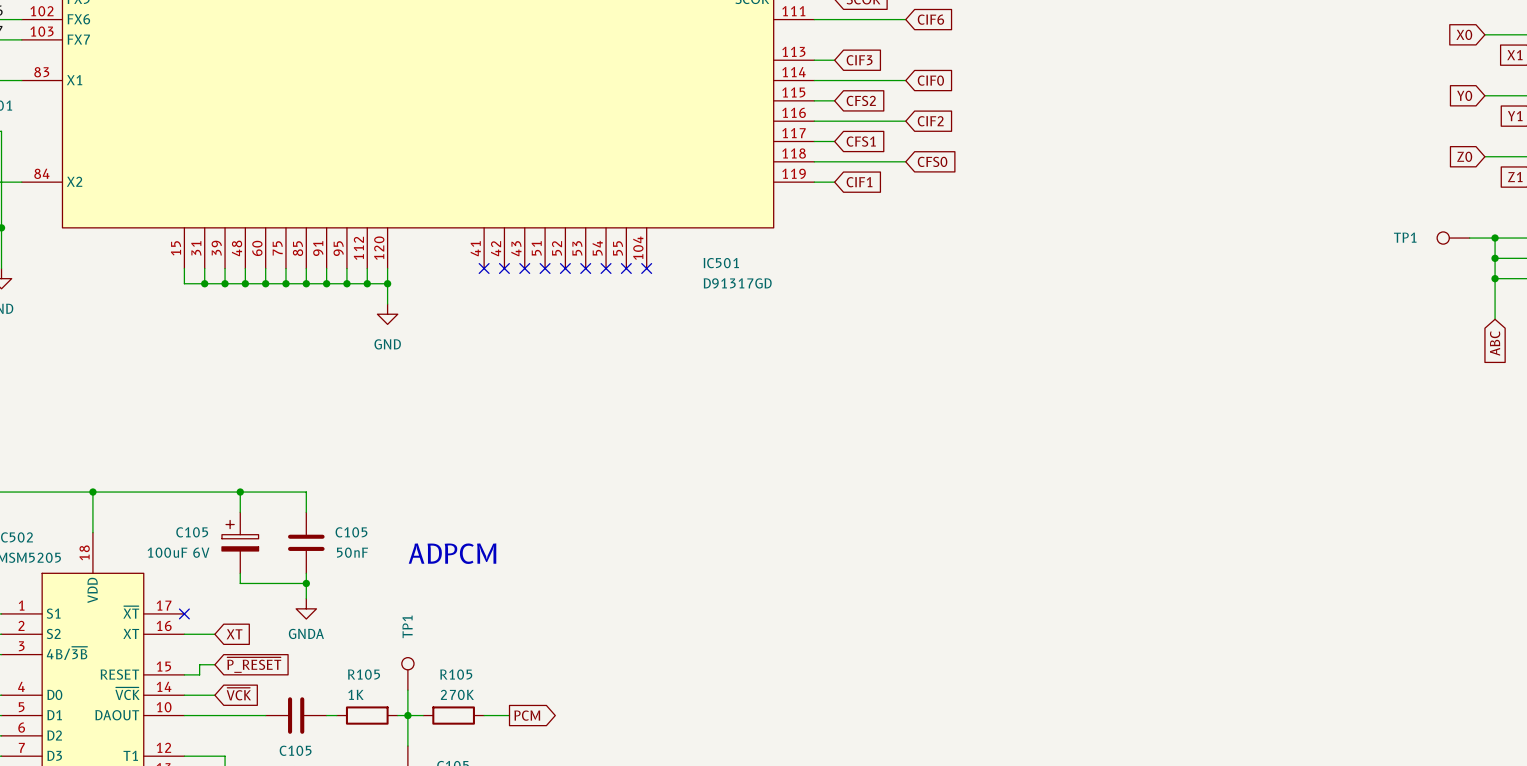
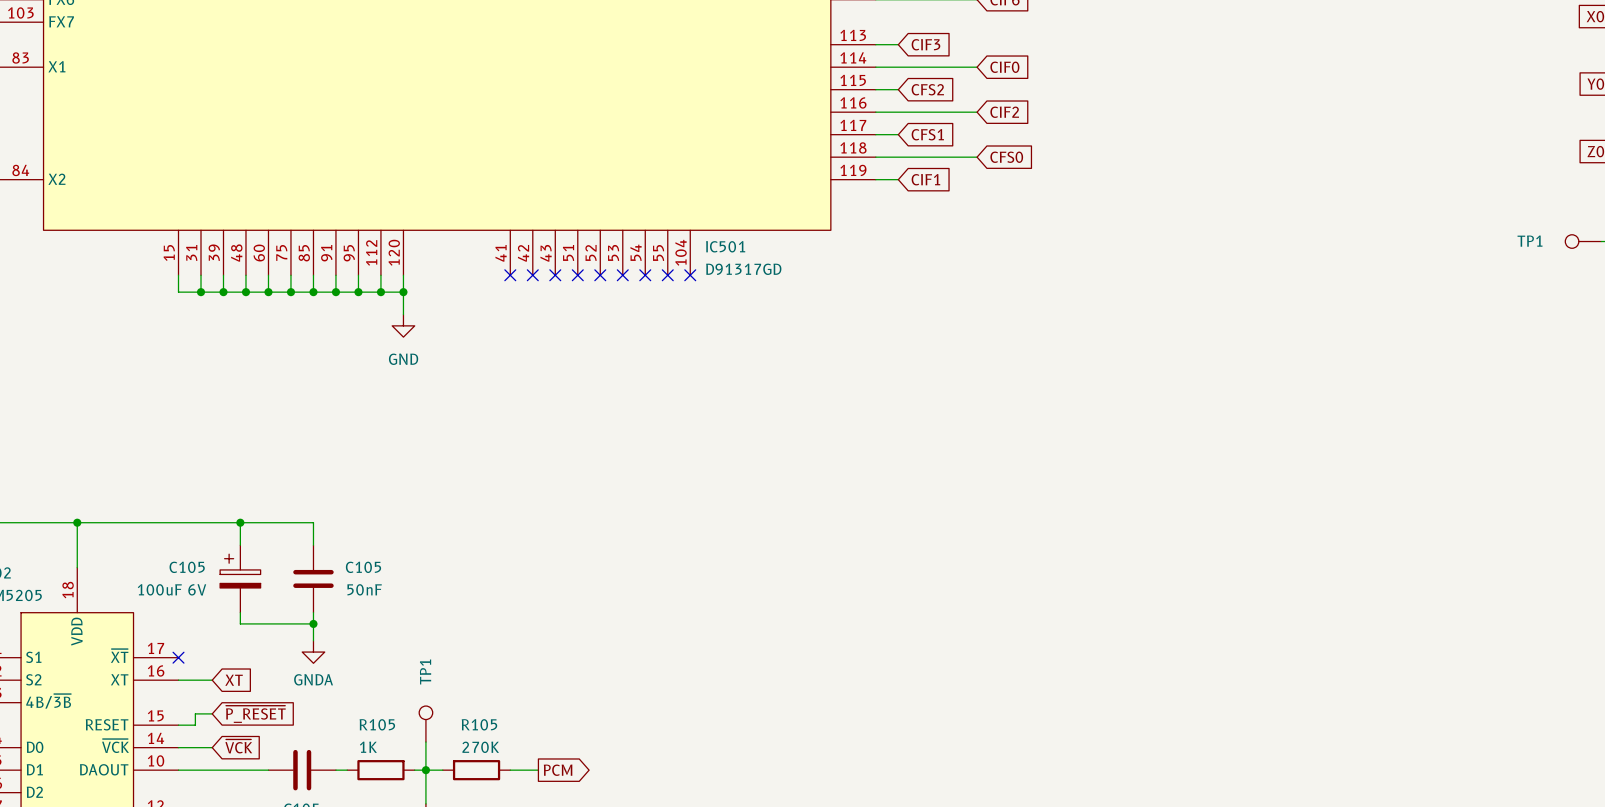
IC501 name position: IC501 (721, 263) -> IC501 (725, 246)
IC501 value position: D91317GD (737, 283) -> D91317GD (743, 269)
text: ADPCM (452, 553) -> none

